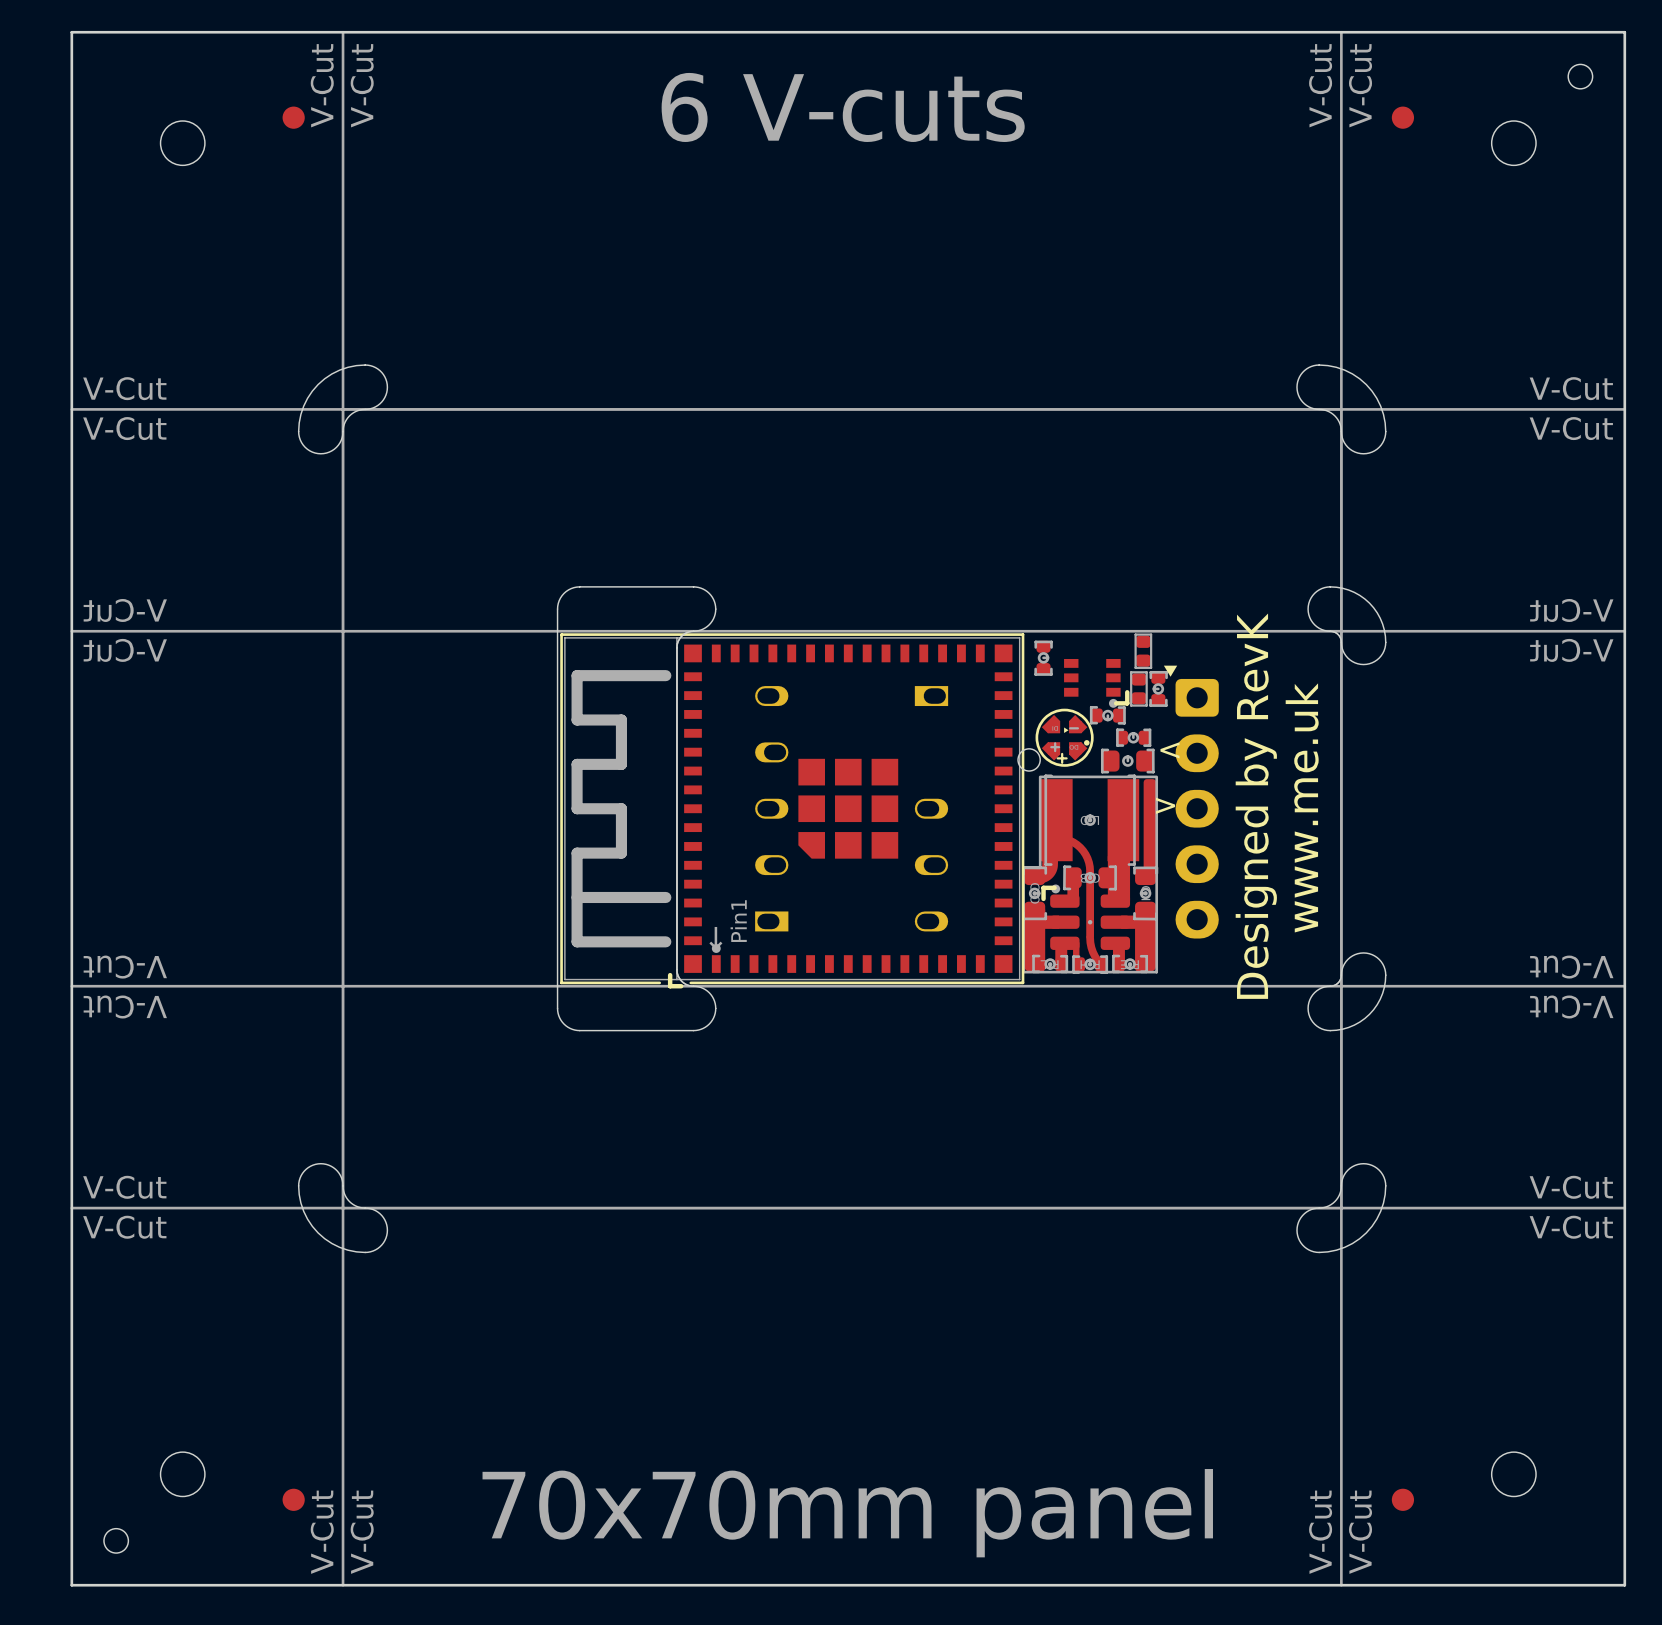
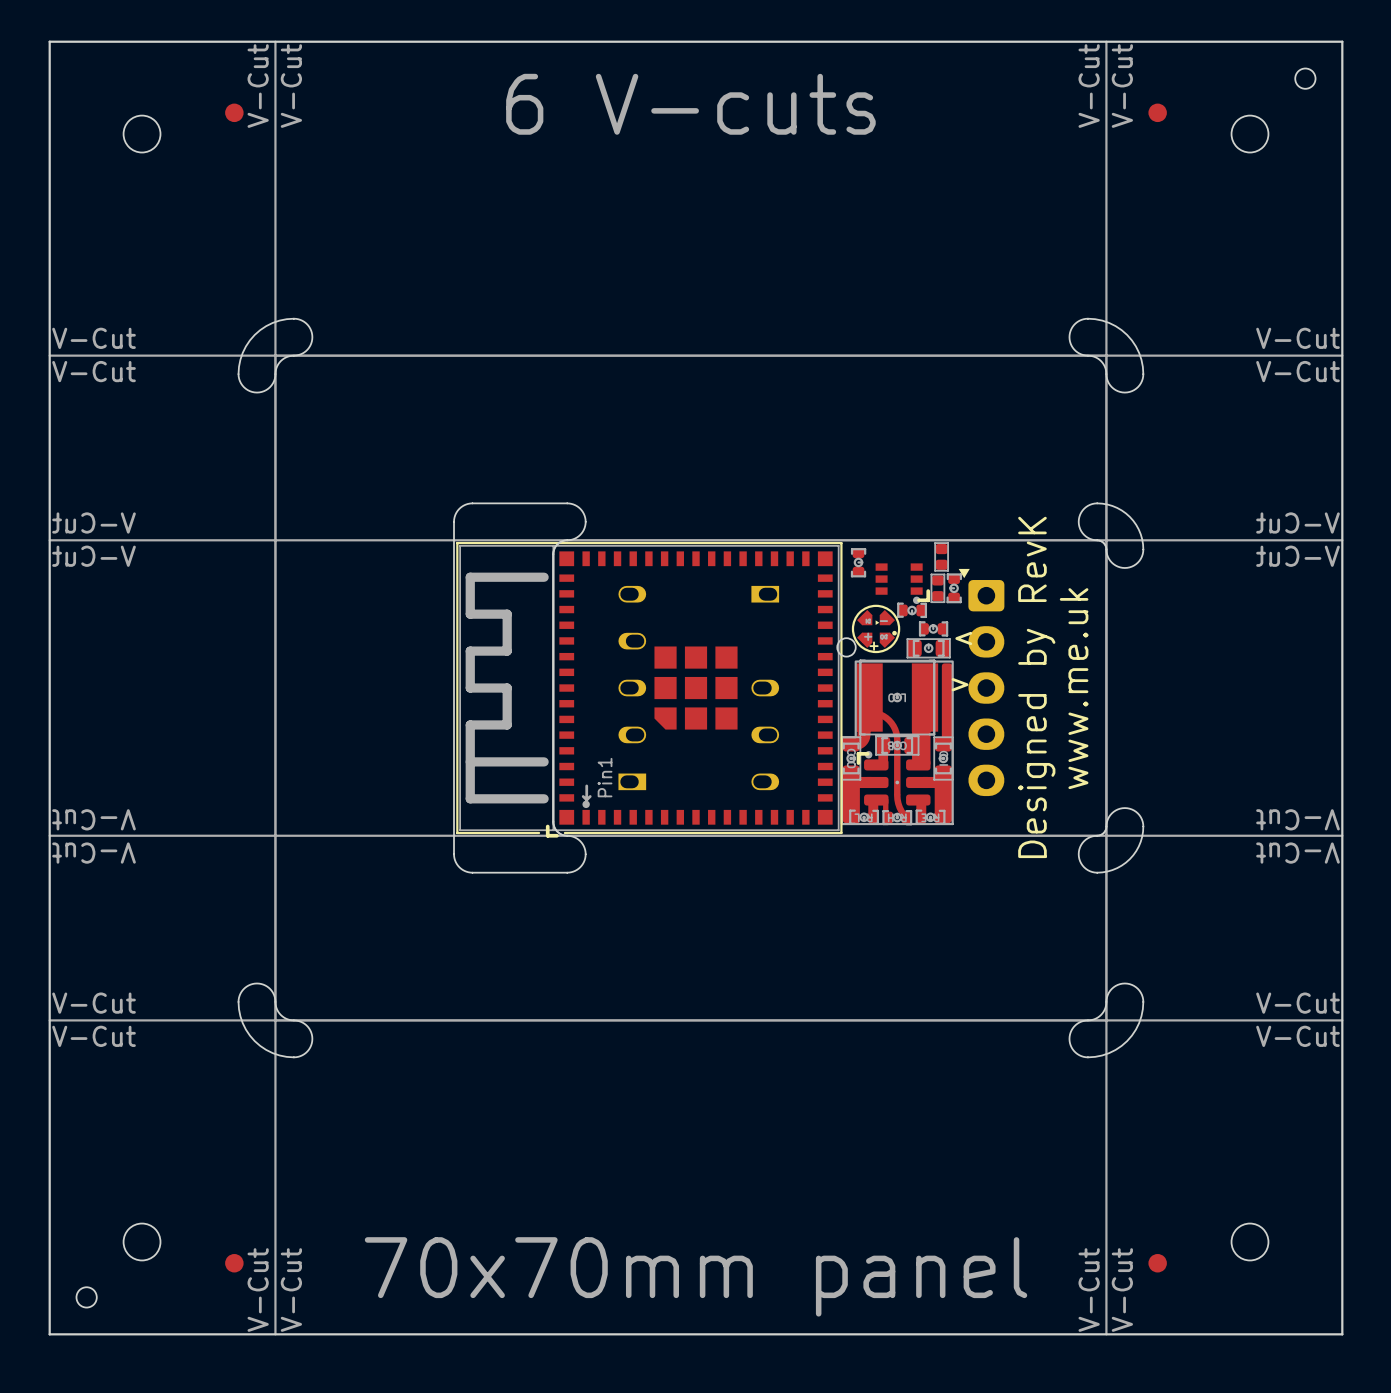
part footprint: [1100, 748, 1155, 774] -> [906, 638, 951, 659]
drawing shape: [1044, 774, 1136, 866] -> [859, 659, 936, 736]
drawing shape: [1063, 865, 1117, 891] -> [875, 735, 920, 756]
drawing shape: [1022, 866, 1048, 921] -> [840, 736, 862, 781]
drawing shape: [1133, 866, 1159, 921] -> [933, 736, 954, 781]

